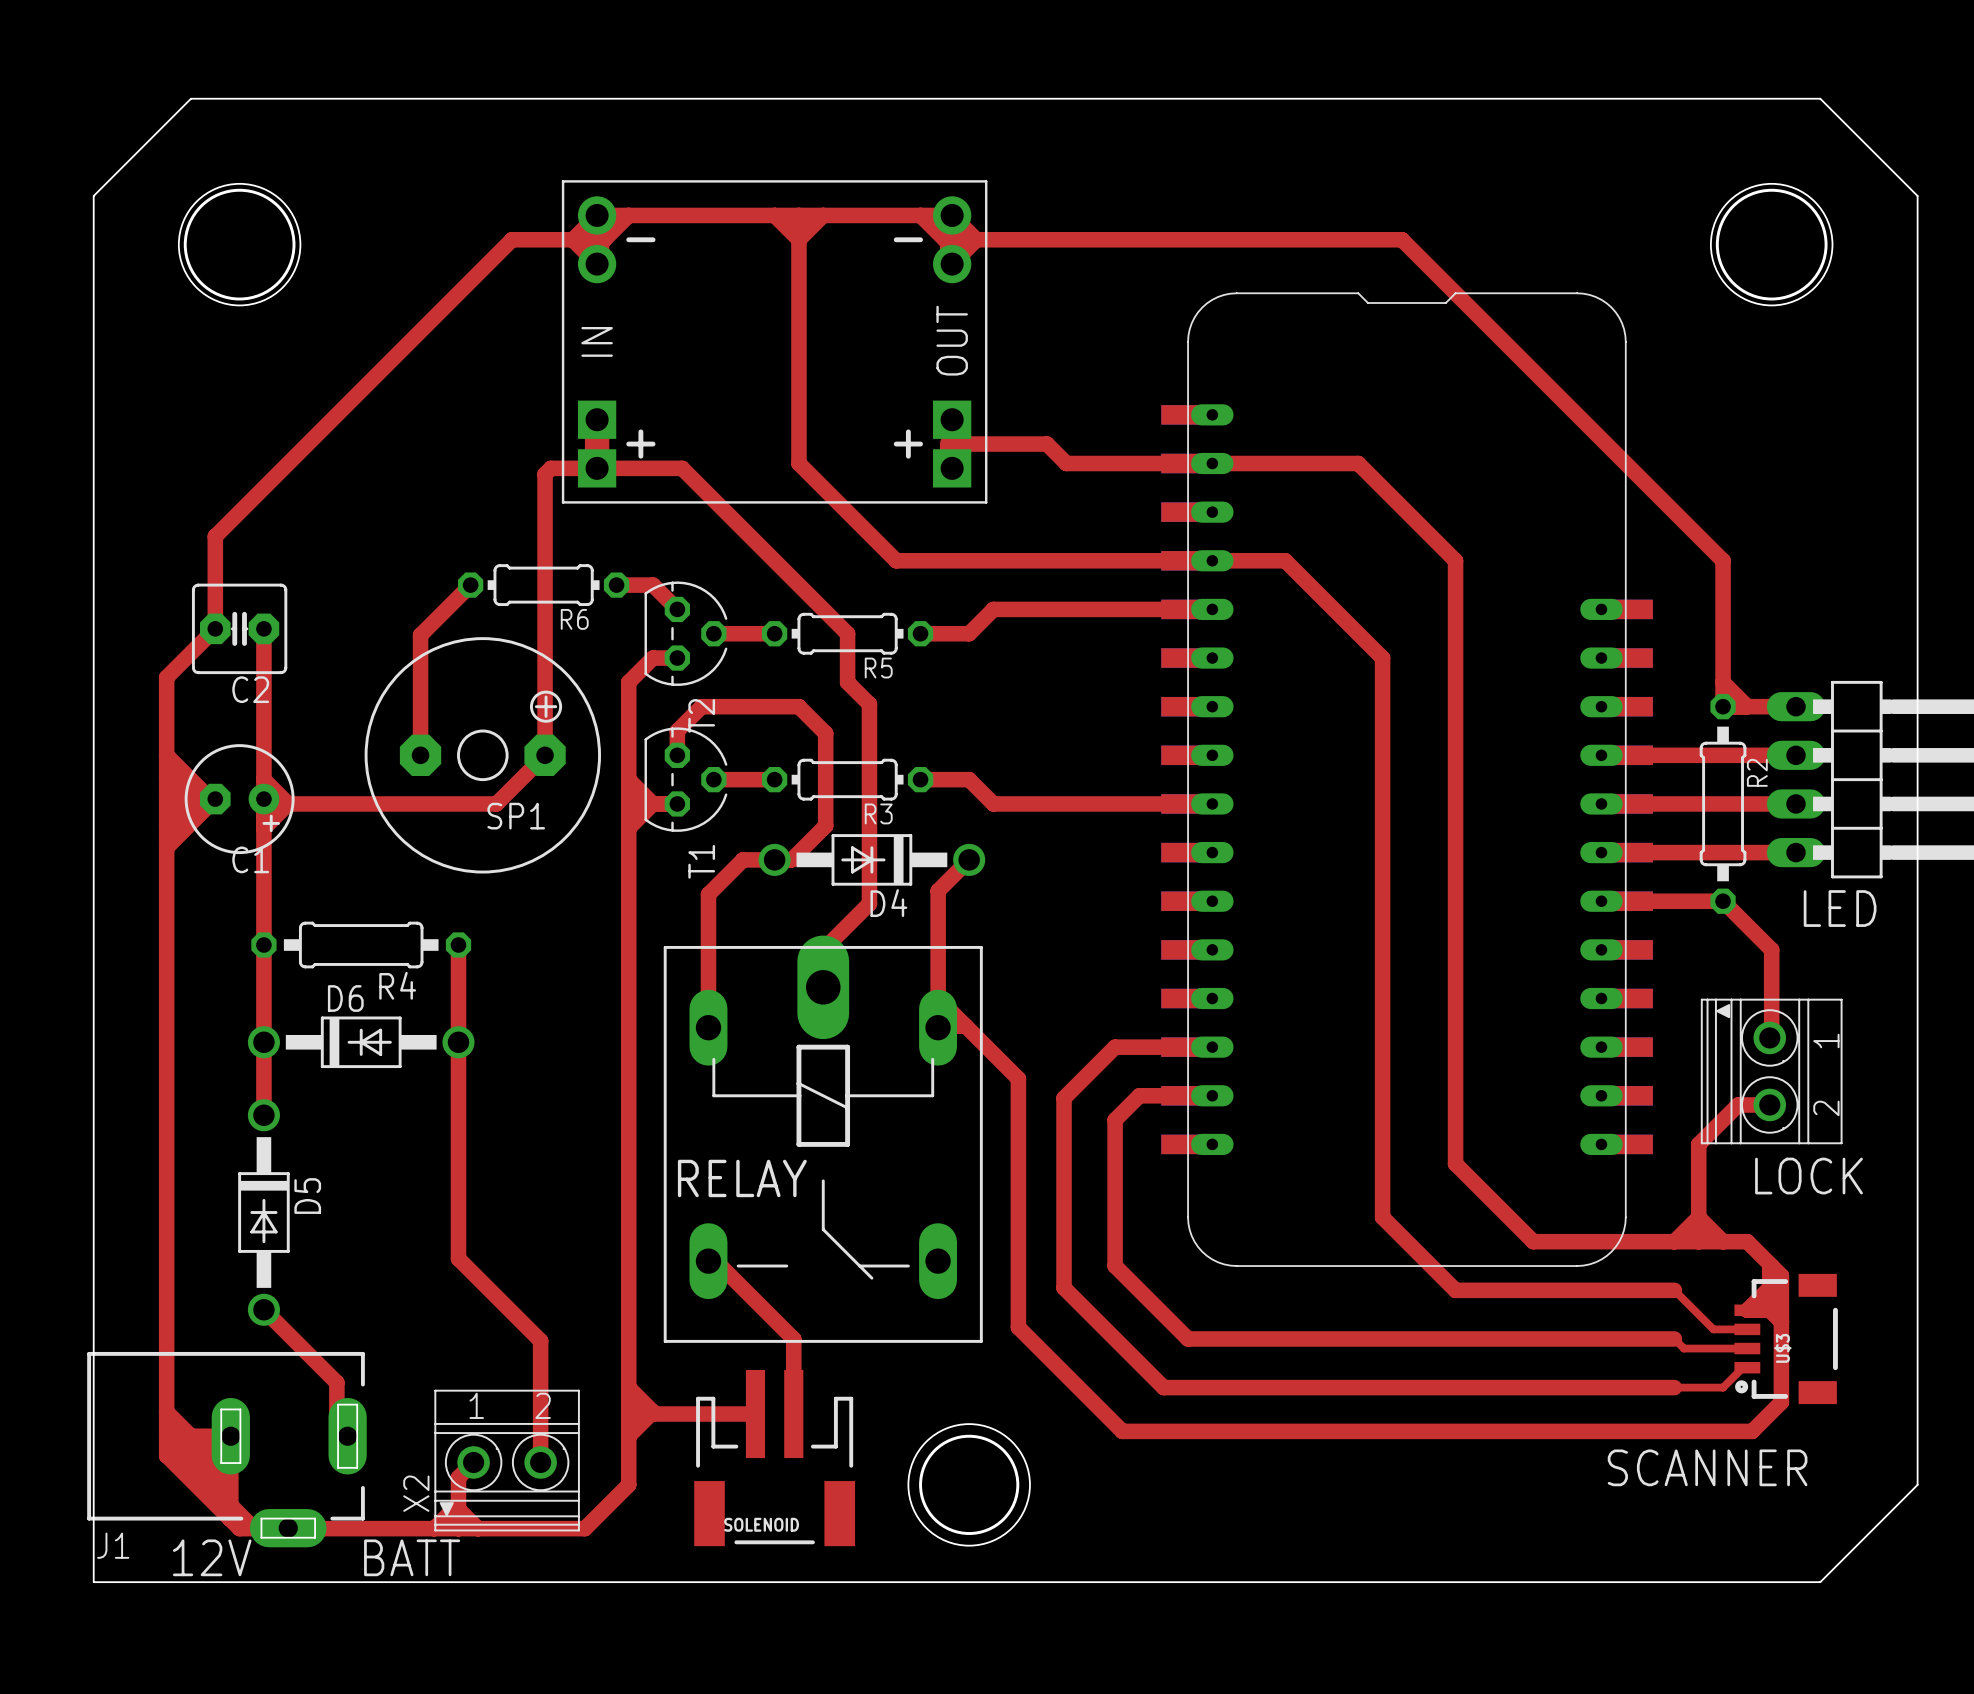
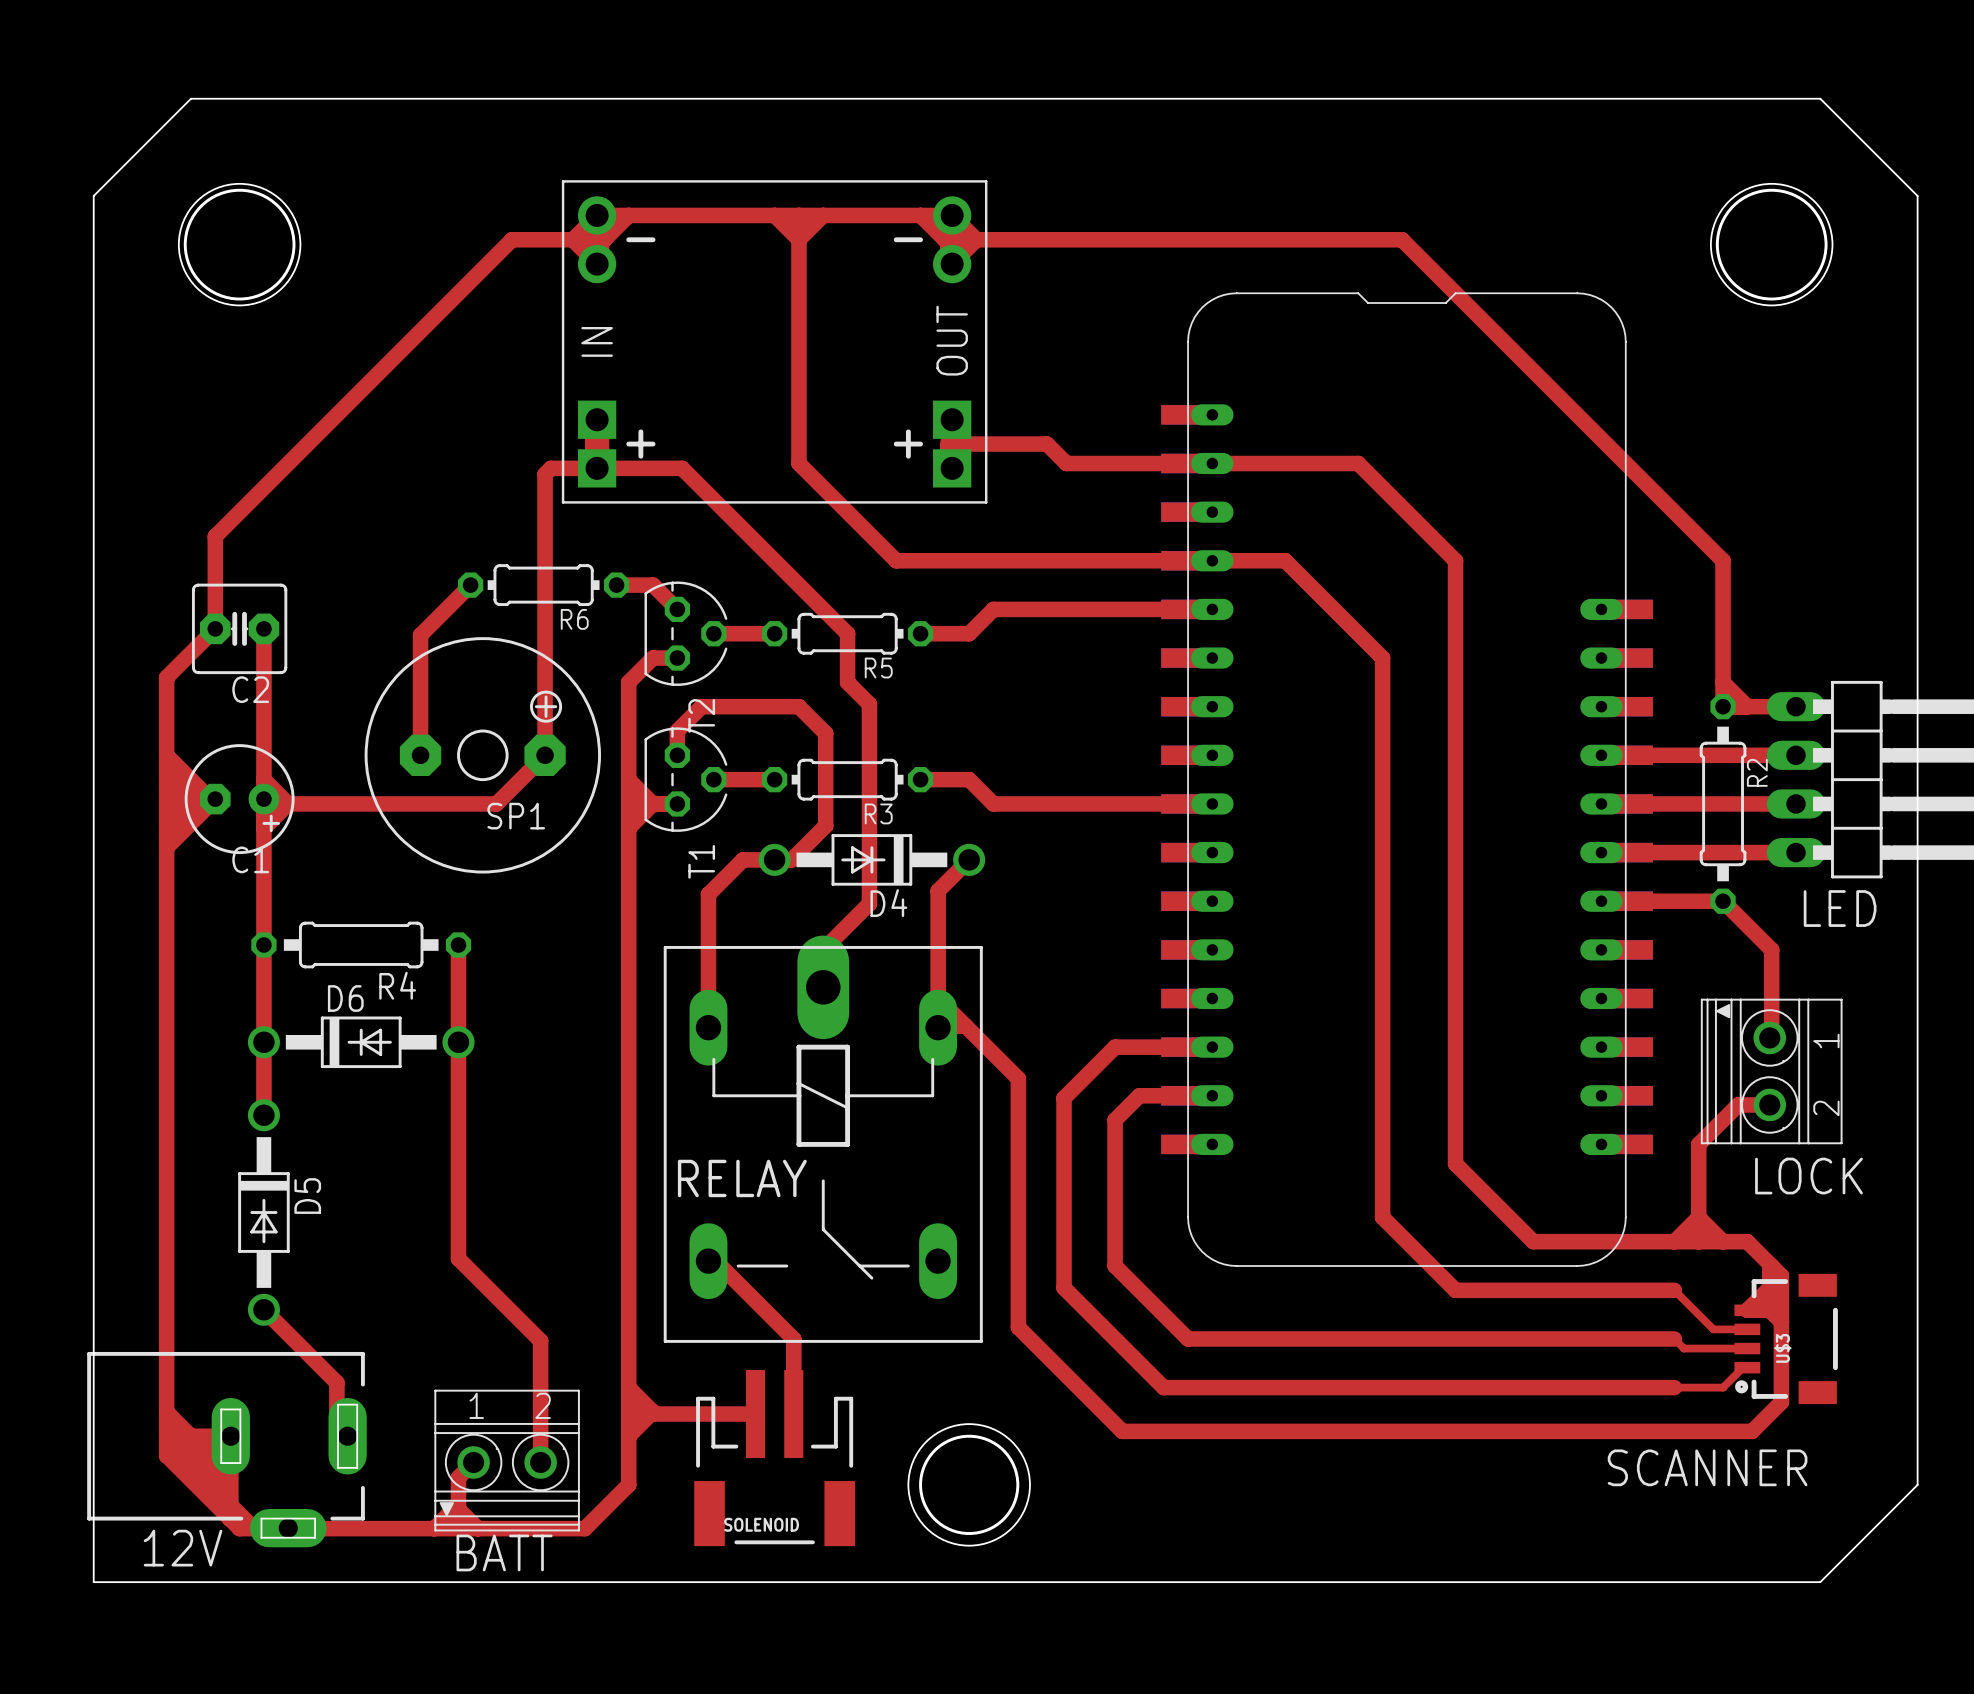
X2 name: X2 (416, 1493) -> none
J1 name: J1 (113, 1545) -> none
text position: 12V (212, 1557) -> 12V (183, 1548)
text position: BATT (412, 1557) -> BATT (504, 1552)

